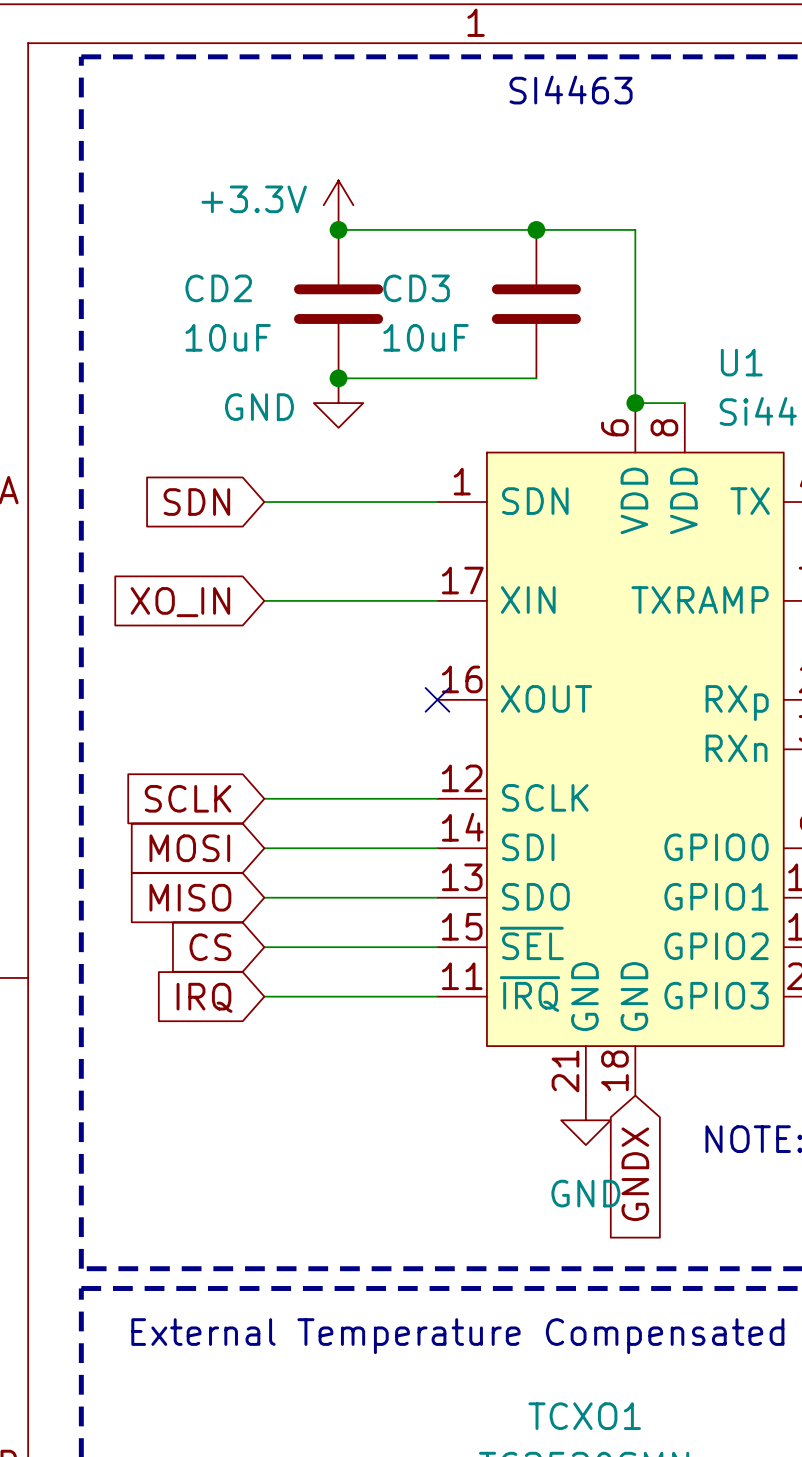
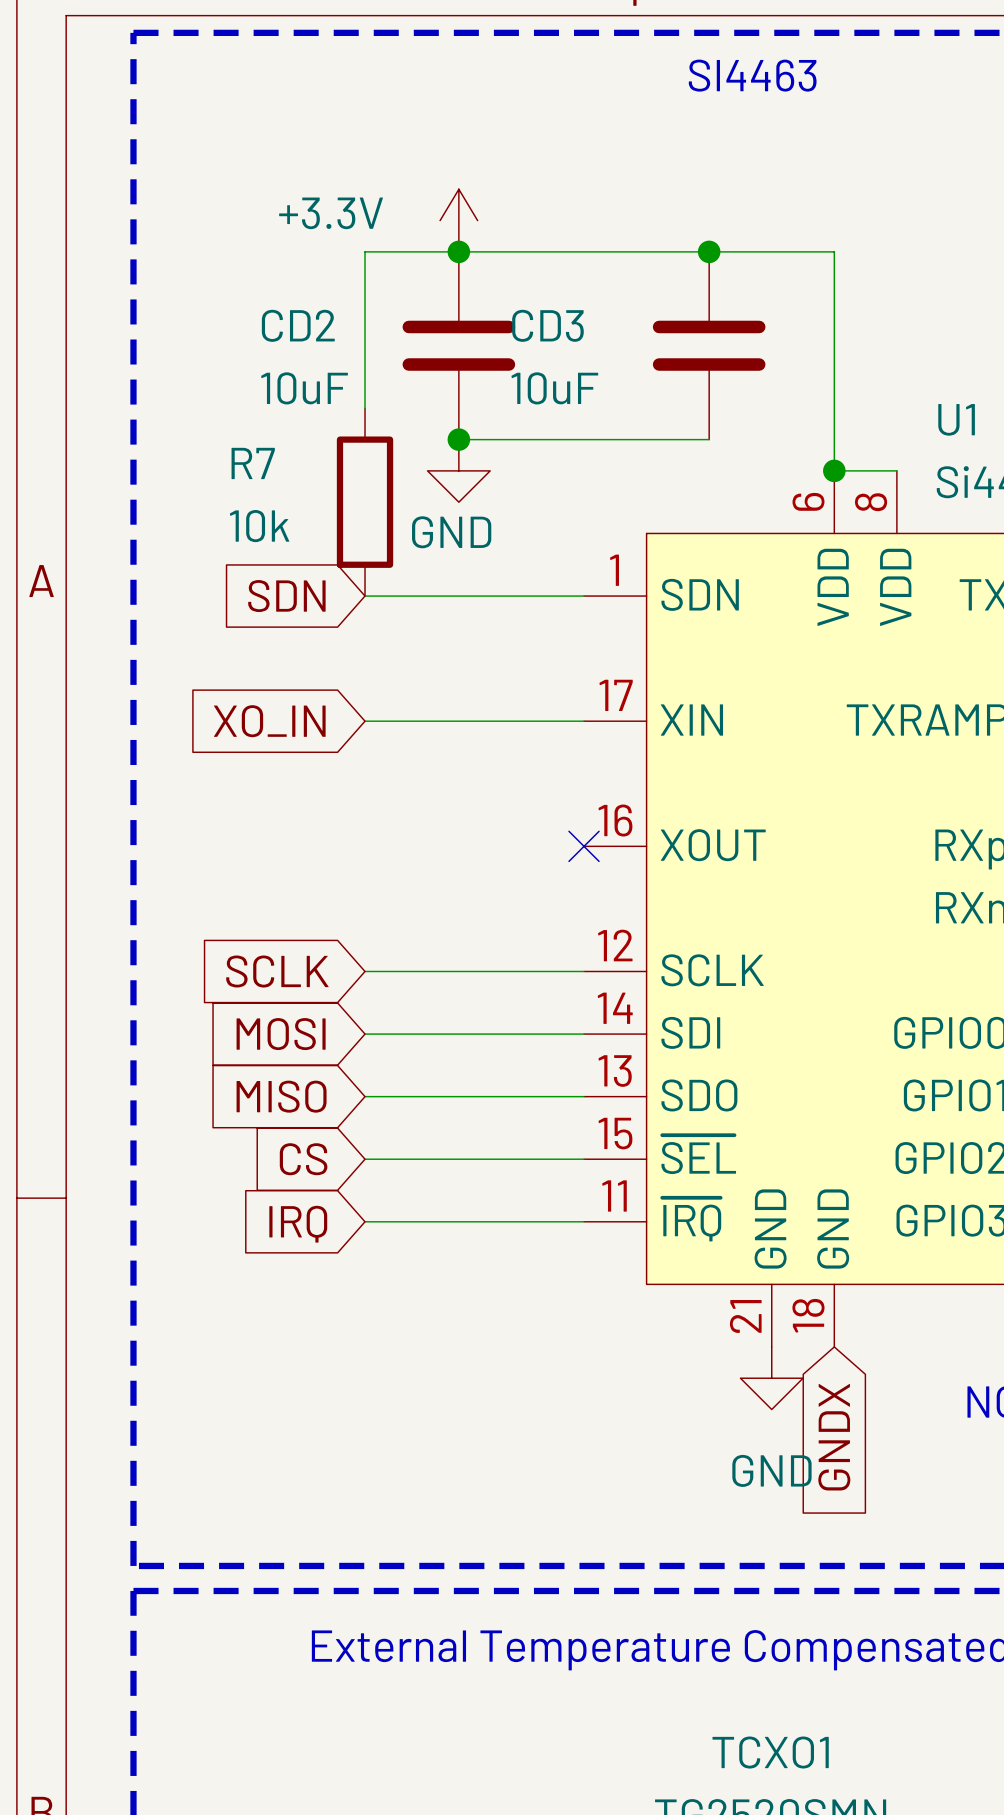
wire: none -> (458, 251) (365, 251) (365, 408)
power symbol text position: GND (259, 407) -> GND (451, 532)
R7: none -> 10k (365, 502)

